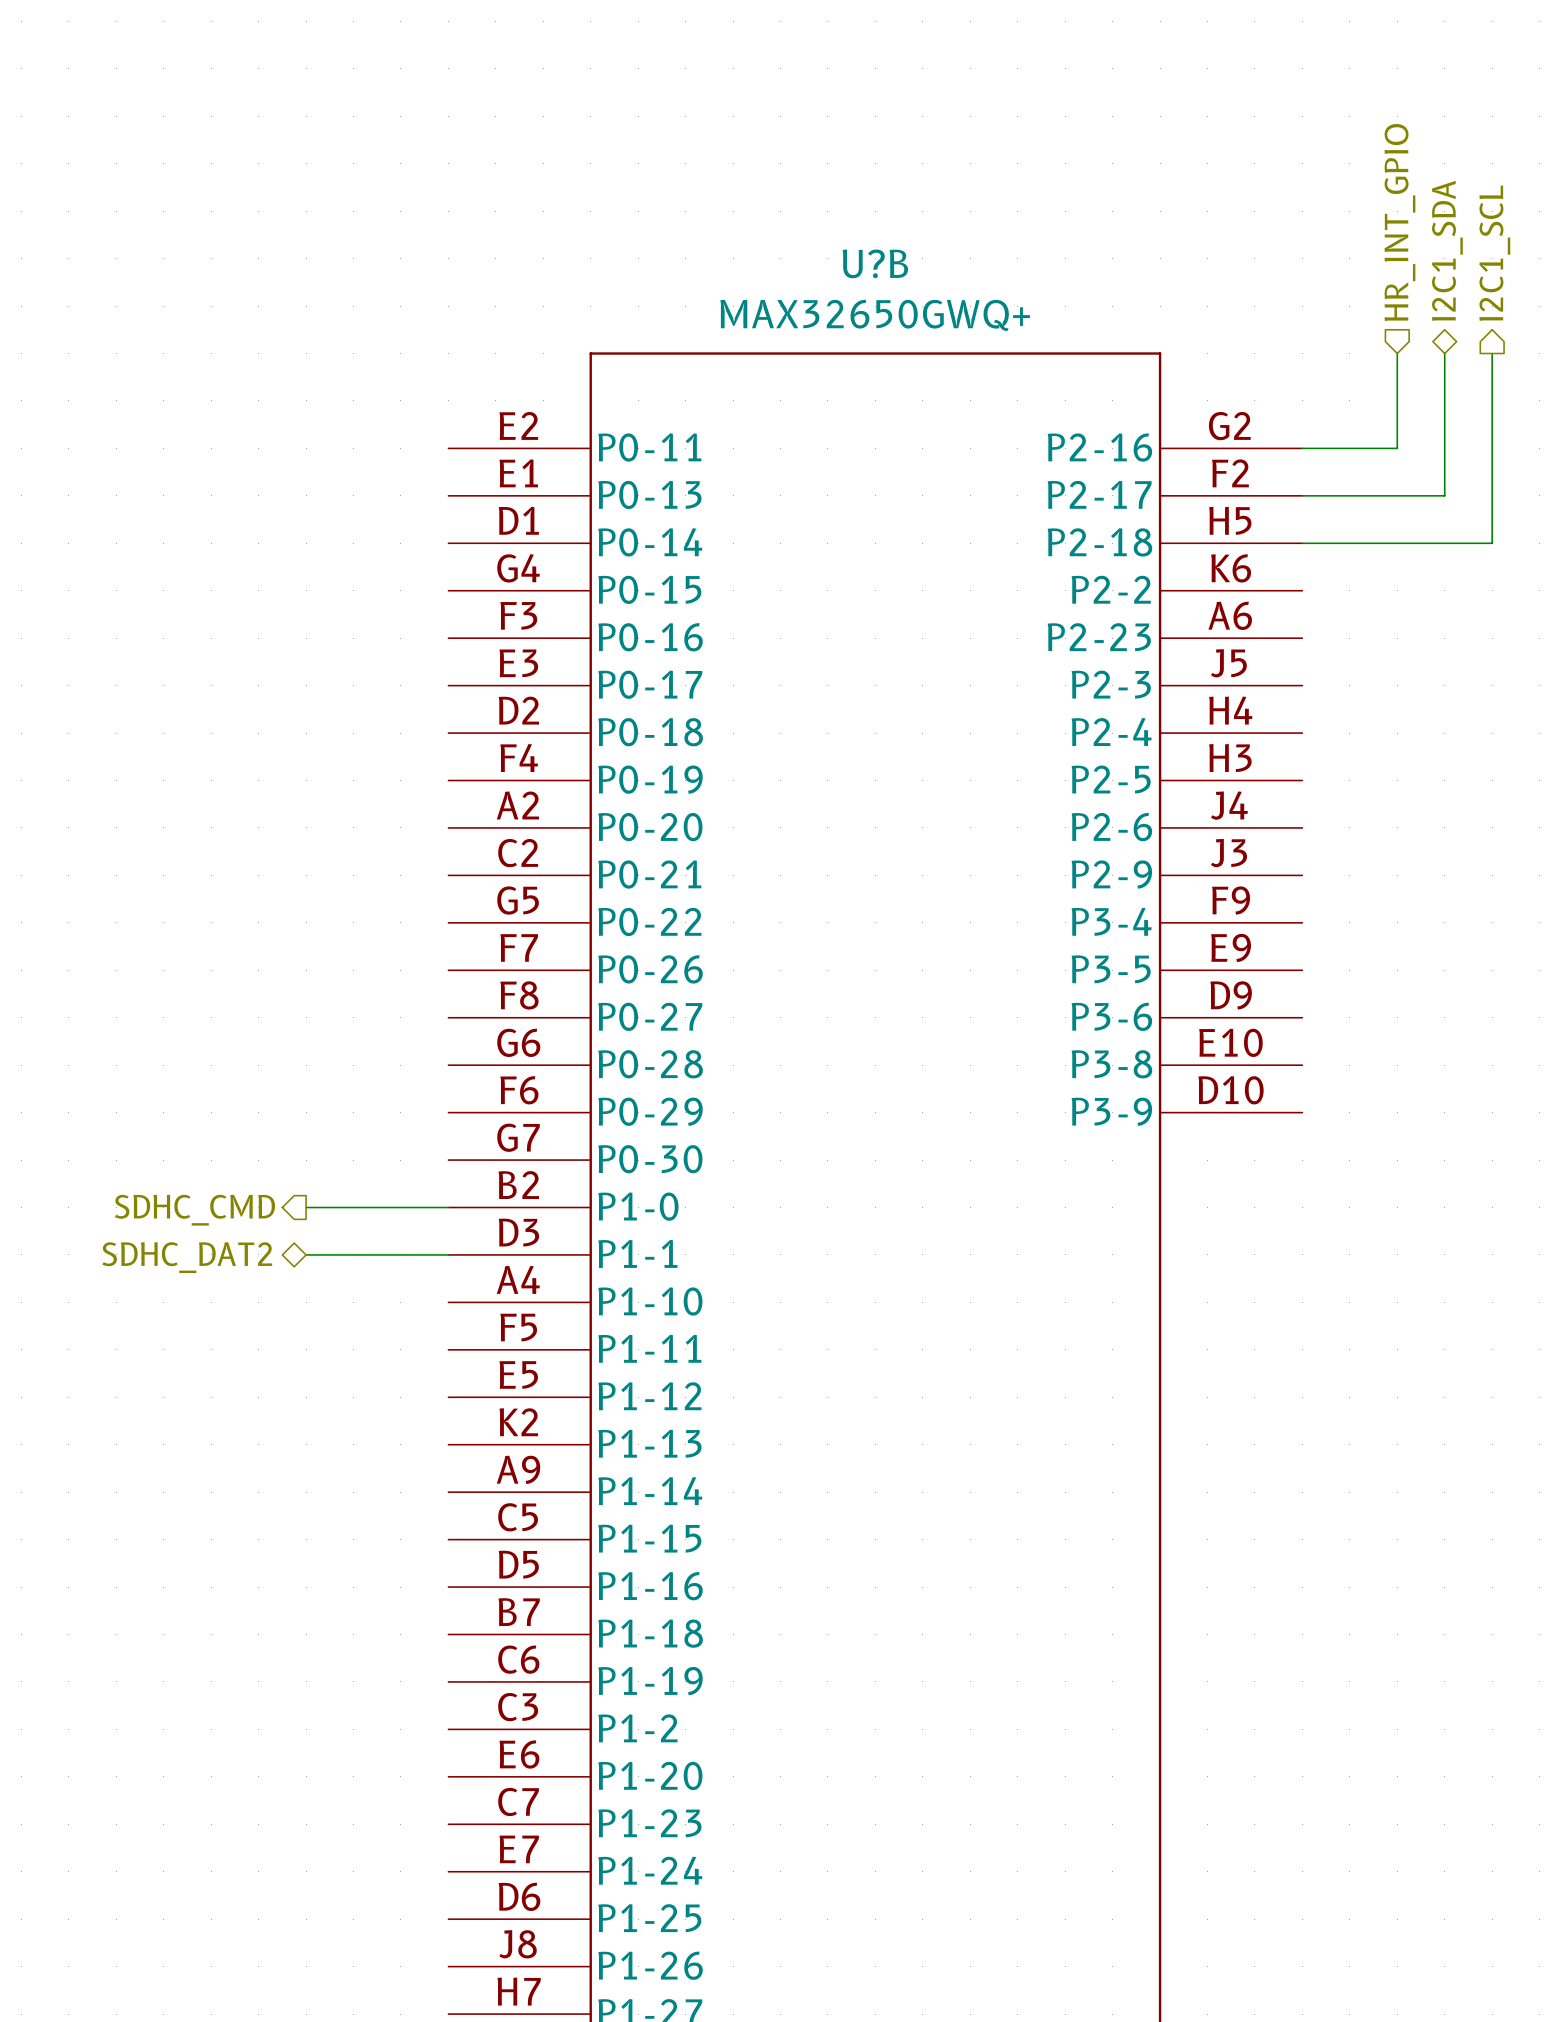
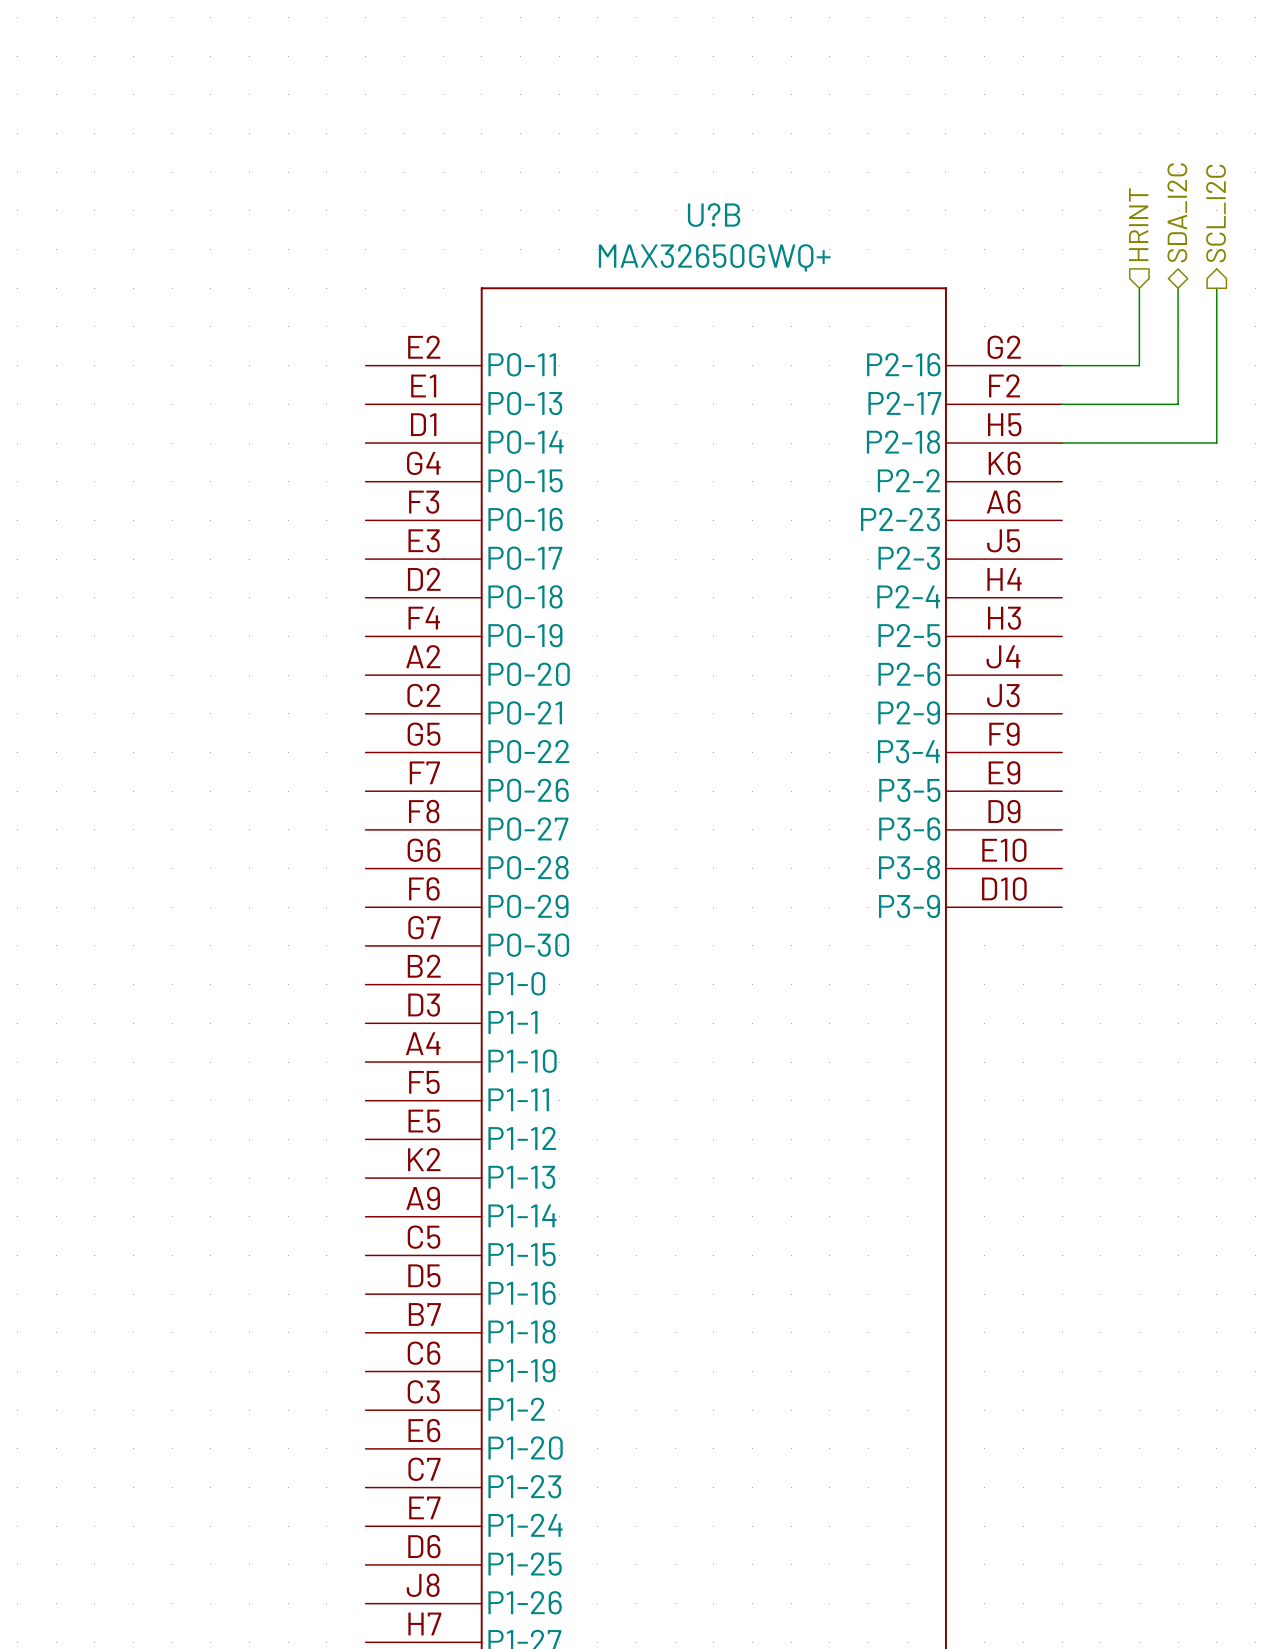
hierarchical label: HR_INT_GPIO (1399, 222) -> HRINT (1138, 224)
hierarchical label: I2C1_SDA (1447, 250) -> SDA_I2C (1177, 212)
hierarchical label: I2C1_SCL (1494, 253) -> SCL_I2C (1216, 213)
wire: (306, 1207) (448, 1207) -> none
hierarchical label: SDHC_CMD (194, 1210) -> none
wire: (306, 1254) (448, 1254) -> none
hierarchical label: SDHC_DAT2 (187, 1257) -> none

